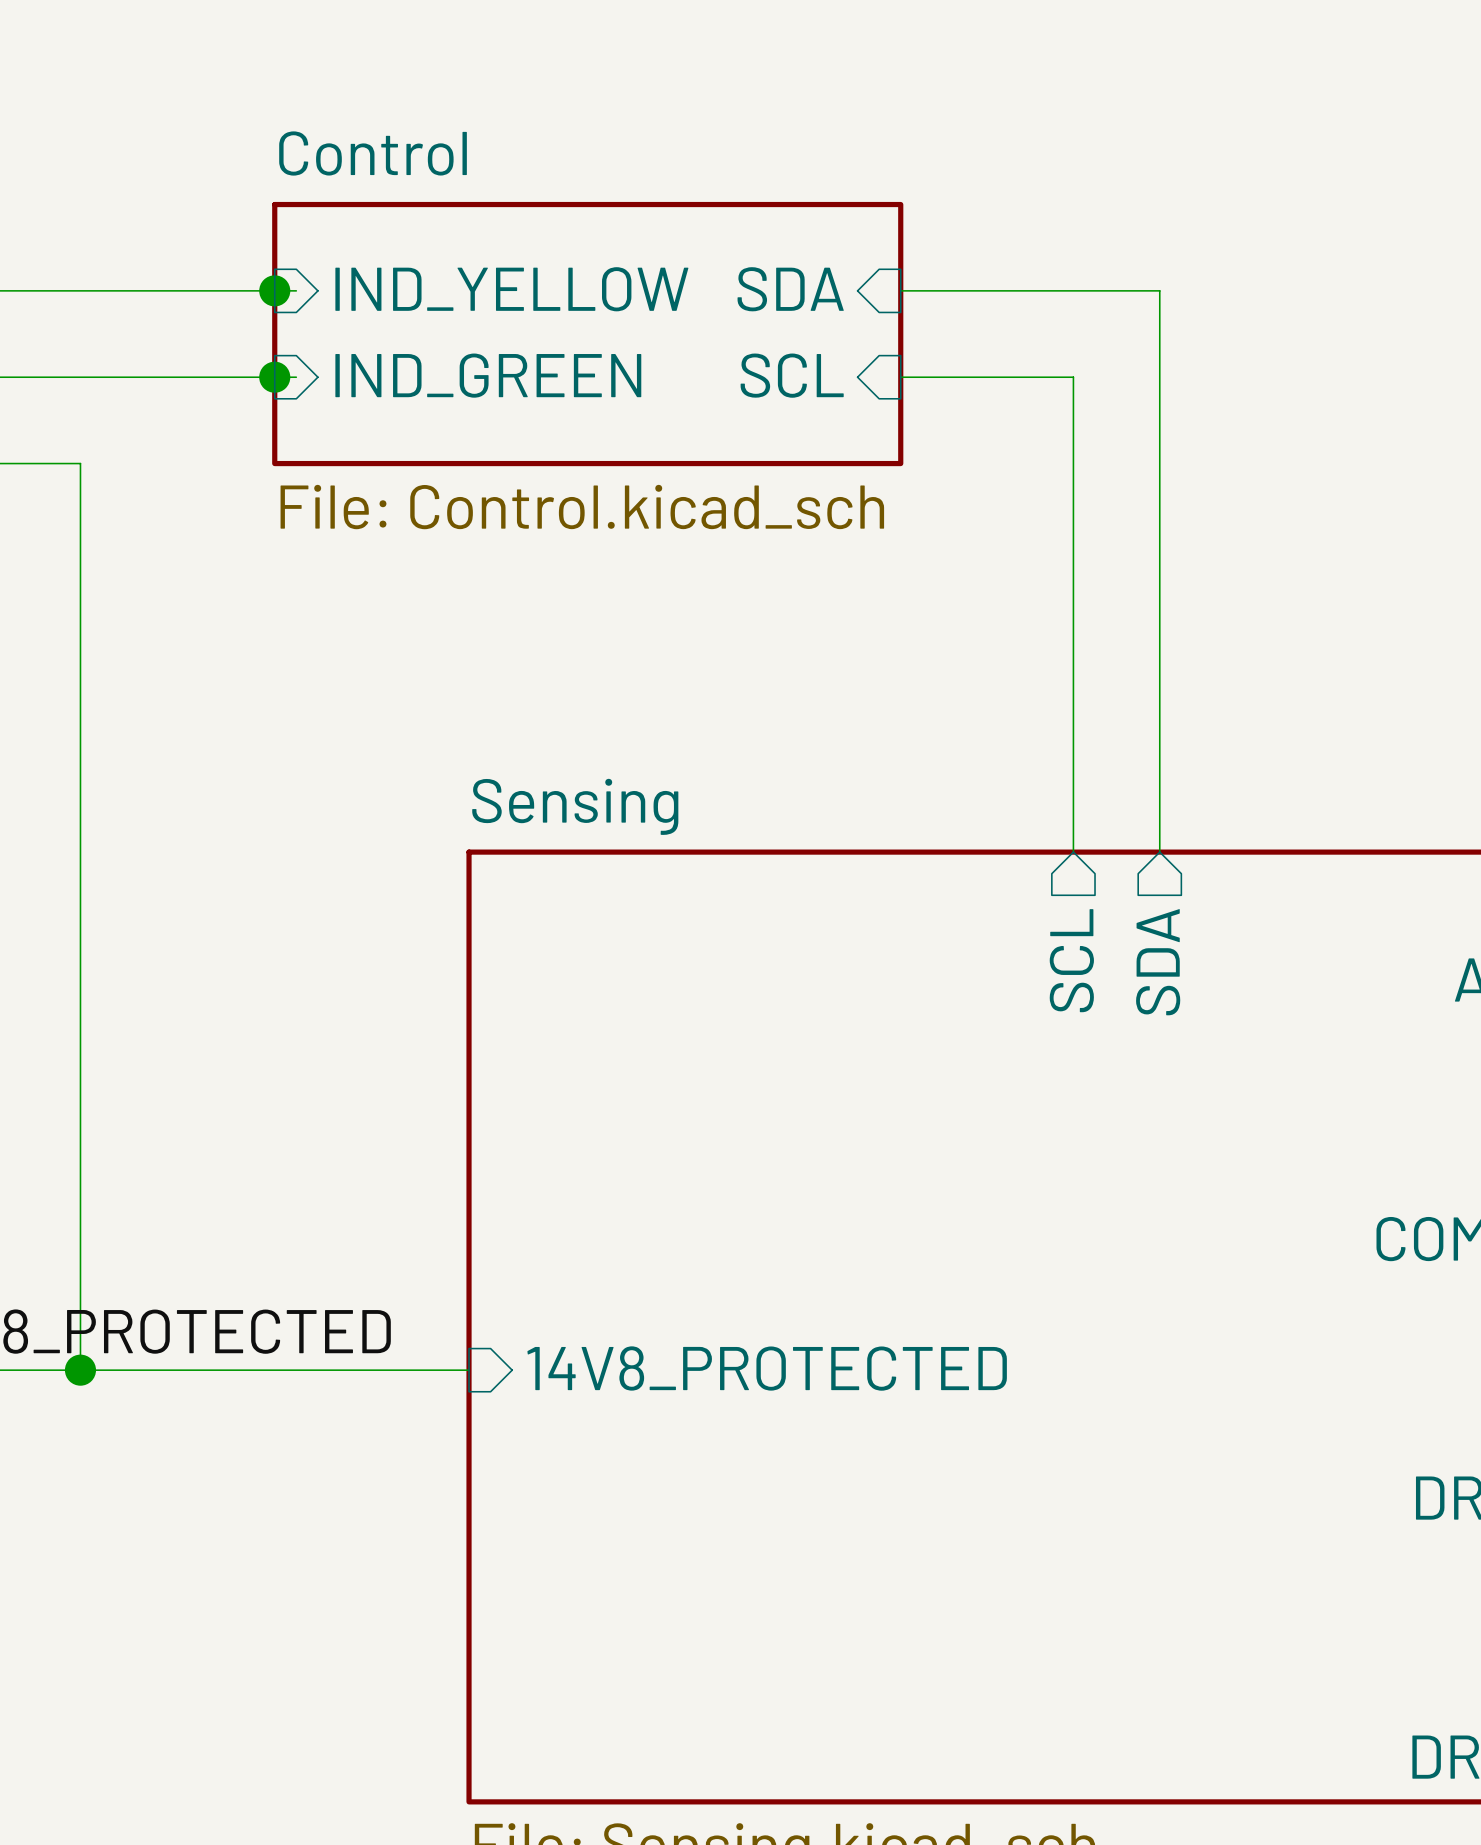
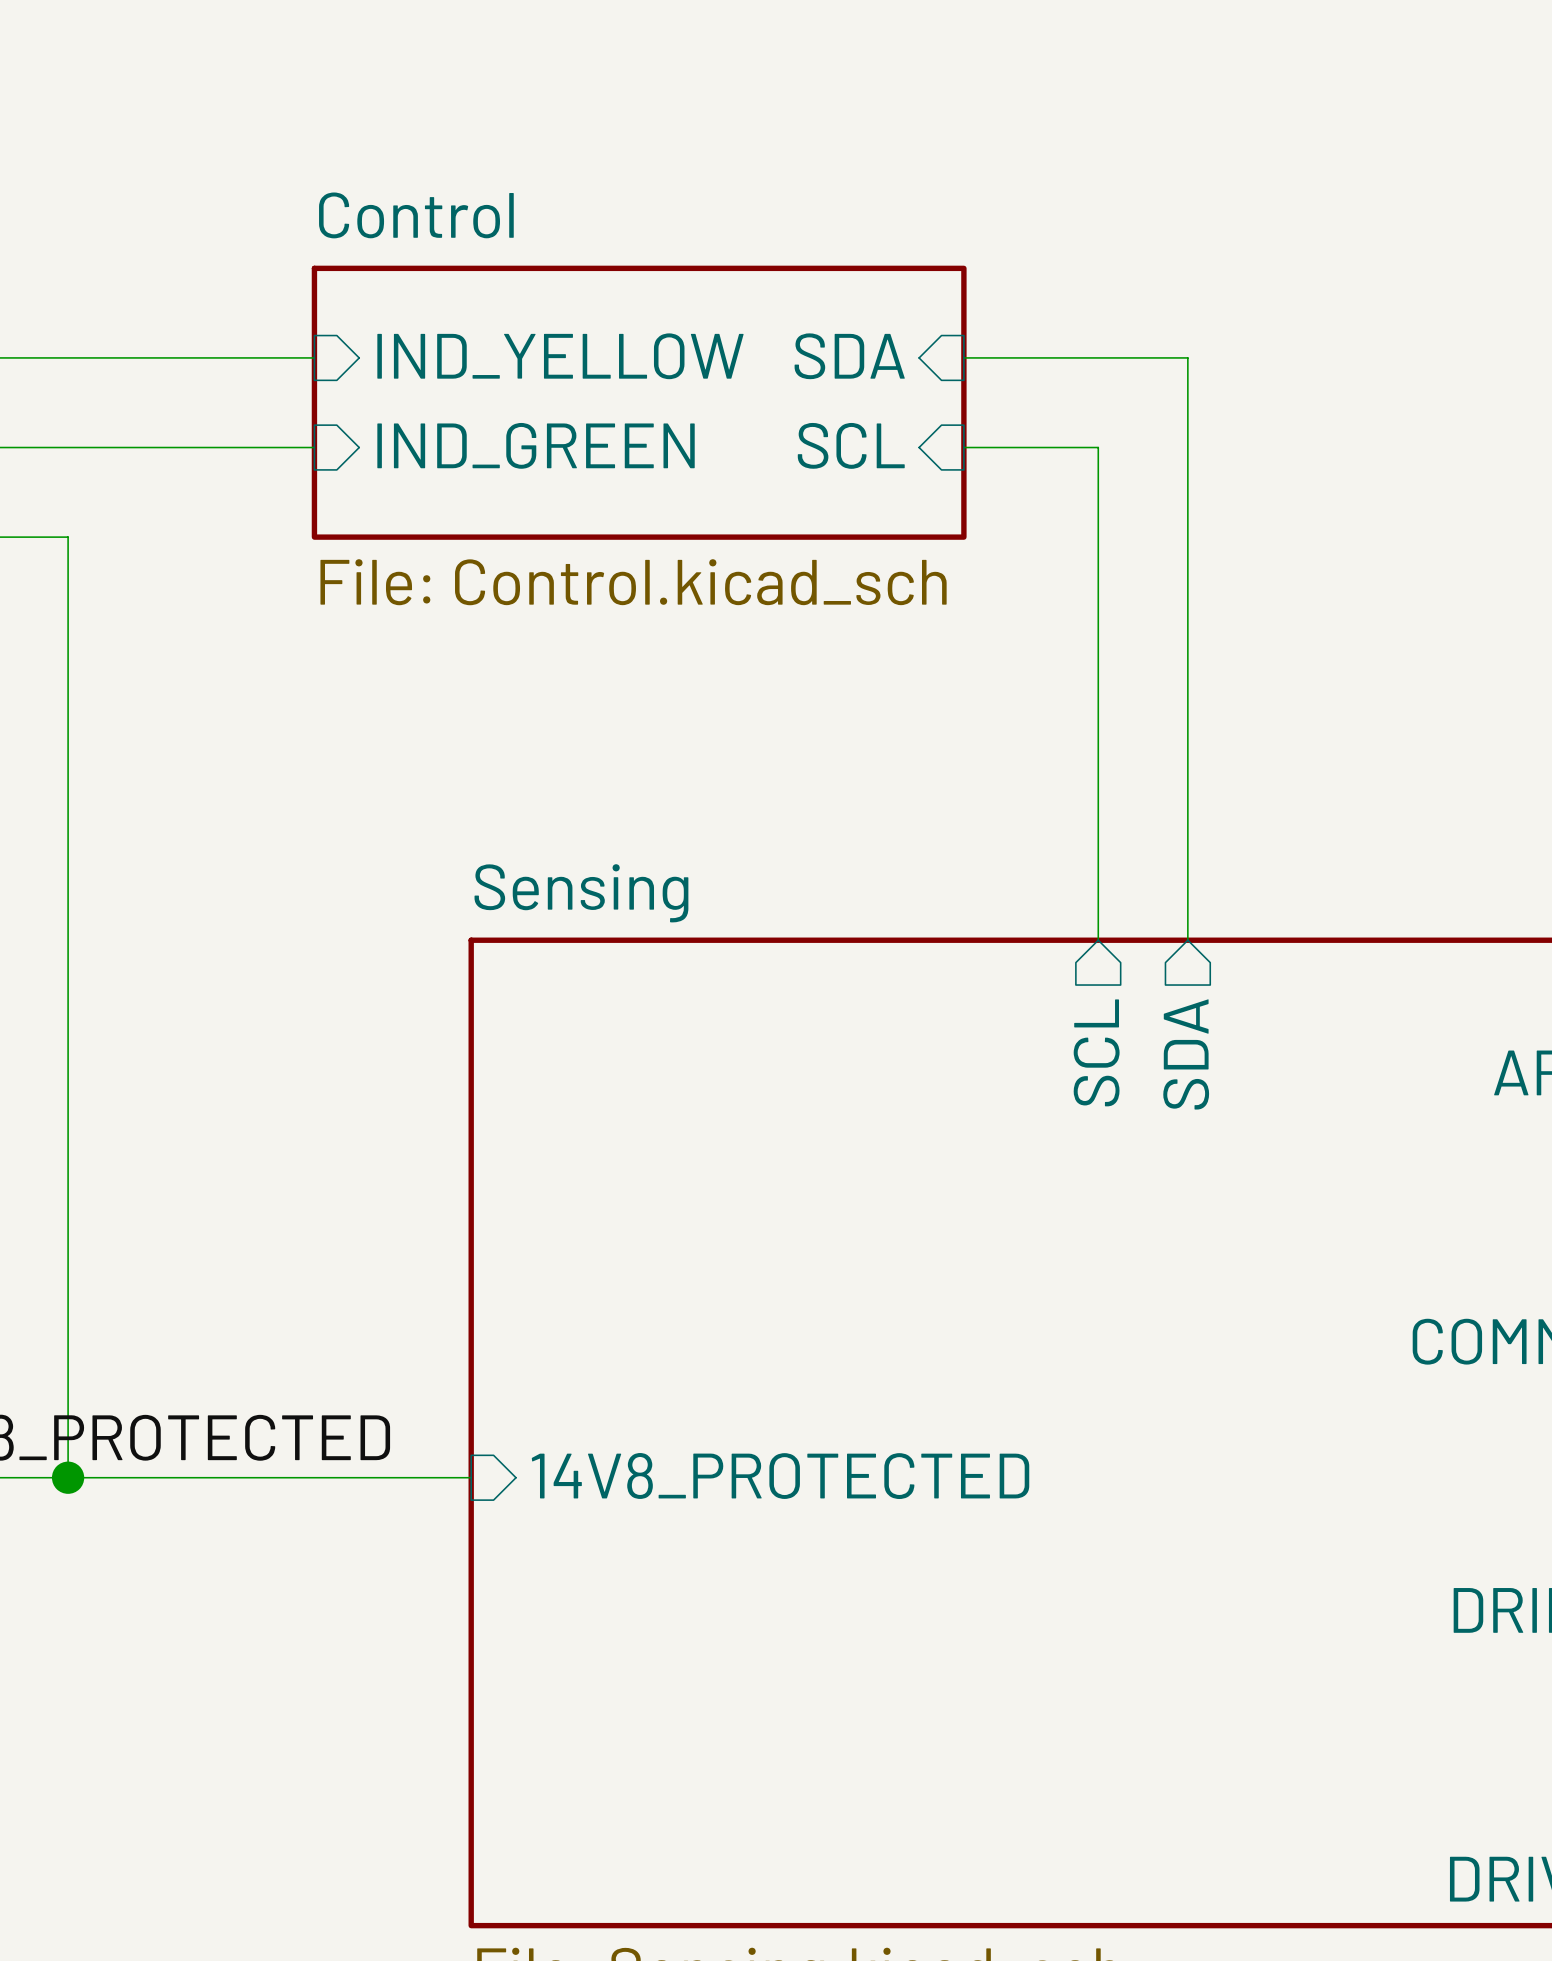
sheet pin position: IND_YELLOW (511, 289) -> IND_YELLOW (560, 356)
sheet pin position: SDA (790, 289) -> SDA (849, 356)
junction: (274, 290) -> none
wire: none -> (292, 357) (314, 357)
wire: (900, 290) (943, 290) -> none
sheet Control position: (587, 334) -> (639, 402)
sheet pin position: IND_GREEN (488, 375) -> IND_GREEN (536, 445)
sheet pin position: SCL (792, 375) -> SCL (851, 445)
junction: (274, 377) -> none
wire: none -> (292, 447) (314, 447)
wire: (900, 377) (943, 377) -> none

